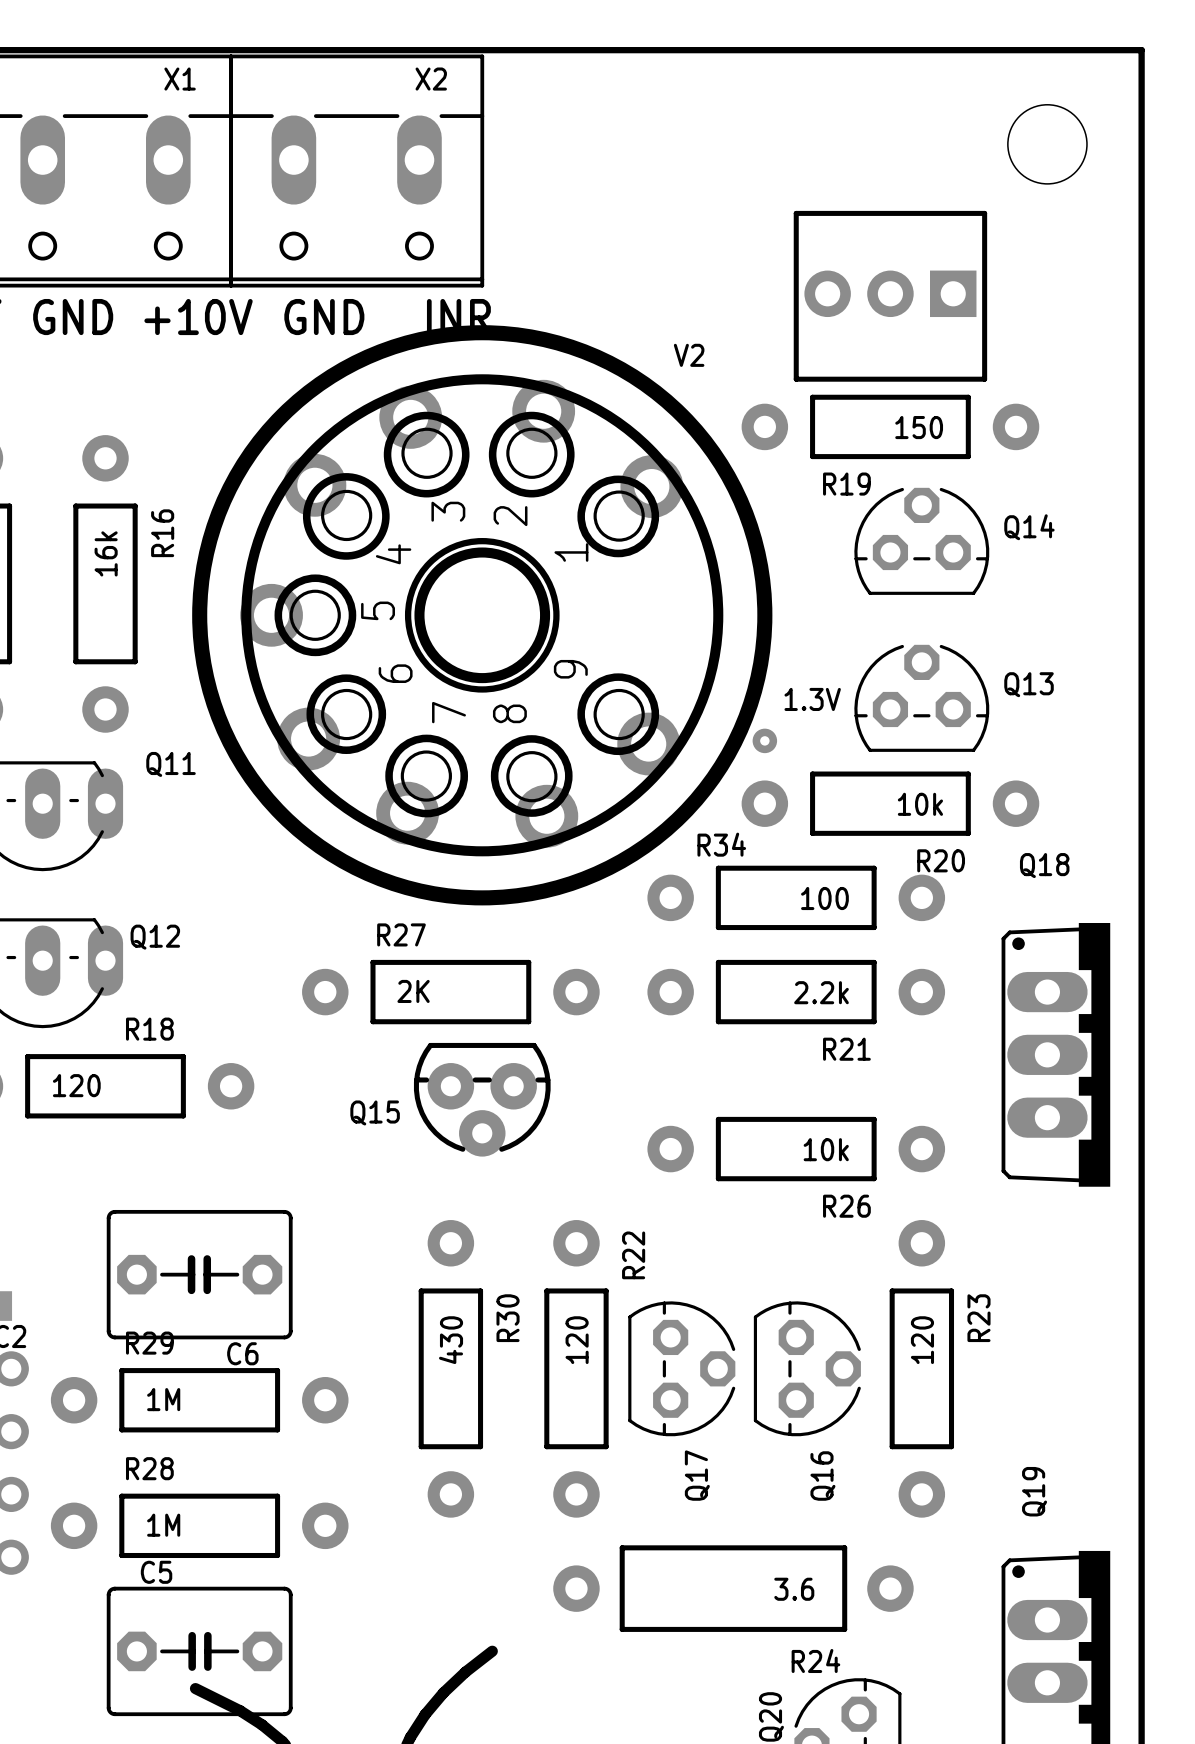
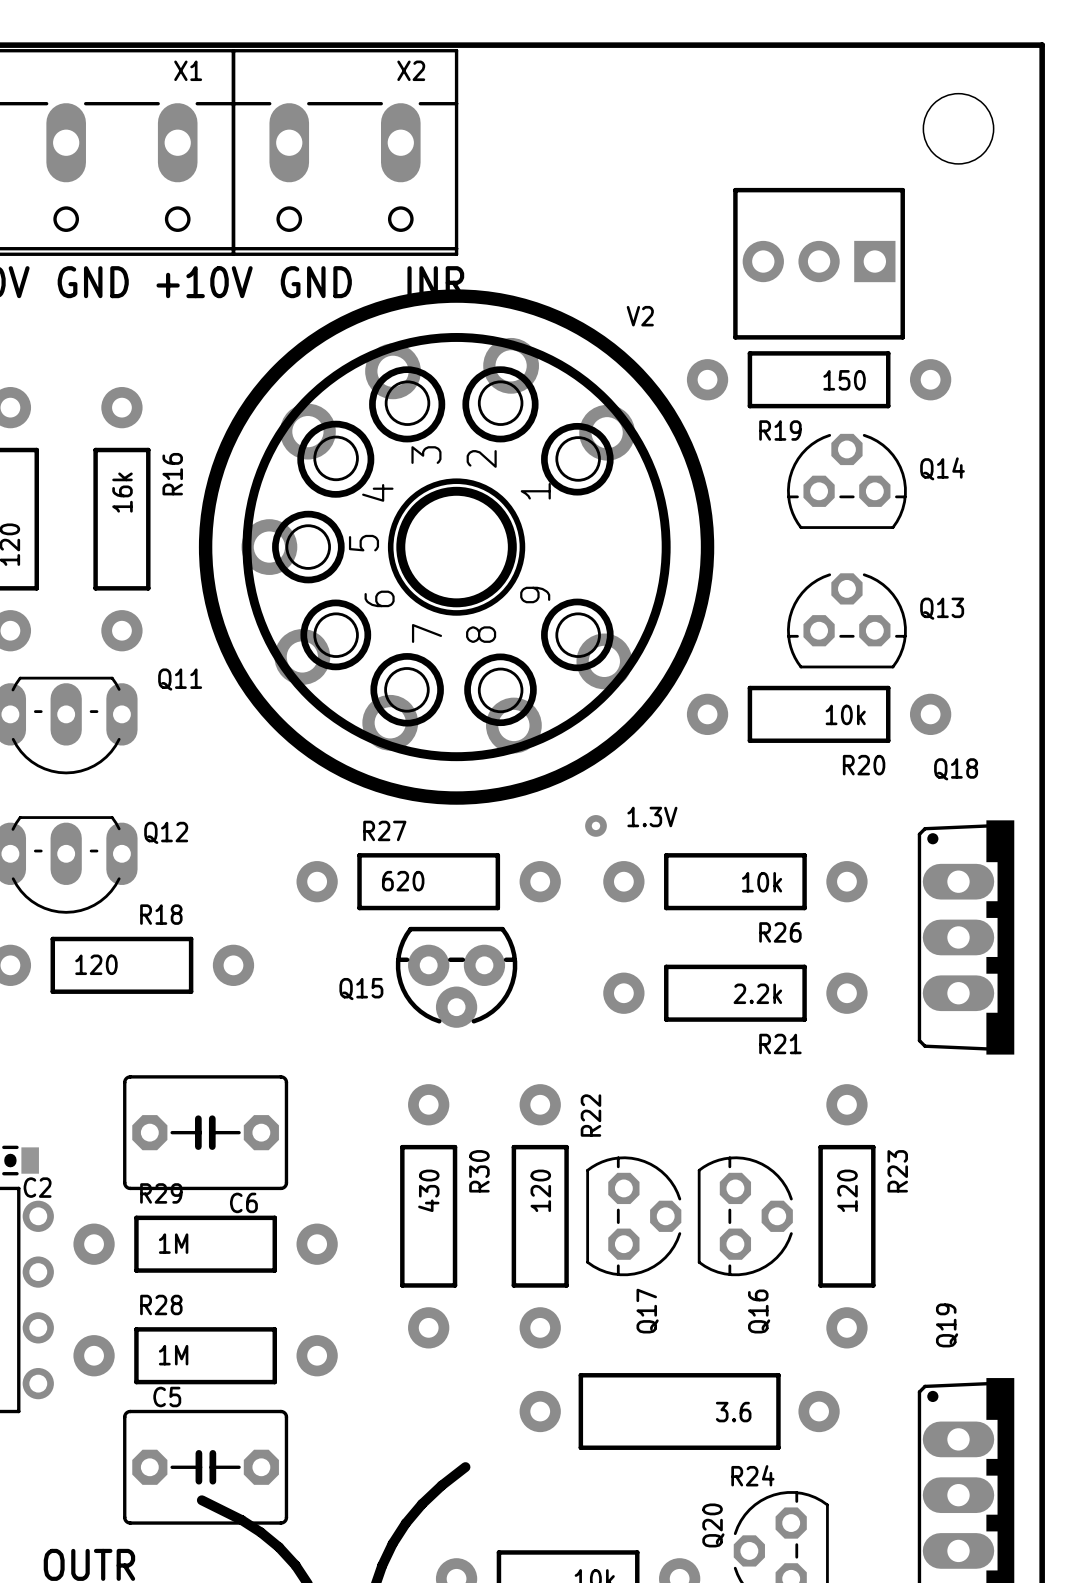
text position: 1.3V (812, 699) -> 1.3V (652, 816)
part position: (764, 740) -> (595, 825)
R34: 100 (796, 897) -> none
R27 value: 2K (413, 991) -> 620 (403, 881)
R21 value: 2.2k (821, 992) -> 10k (762, 882)
R21 name: R21 (846, 1049) -> R26 (780, 932)
R21: none -> 2.2k (735, 993)
R26: 10k (796, 1149) -> none

